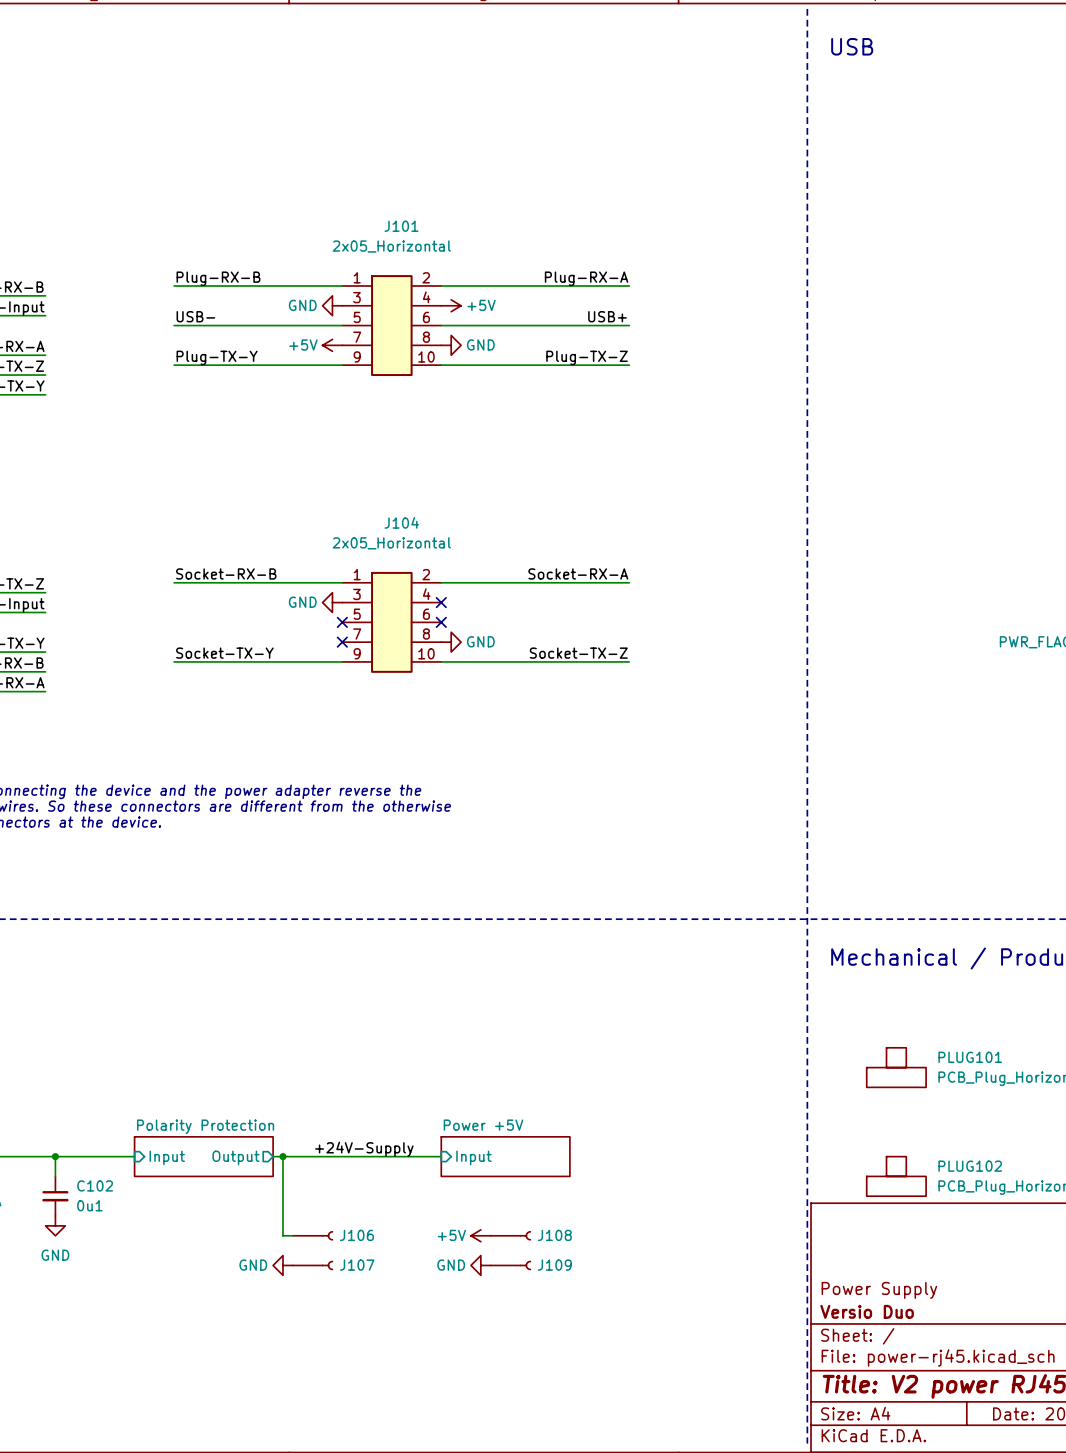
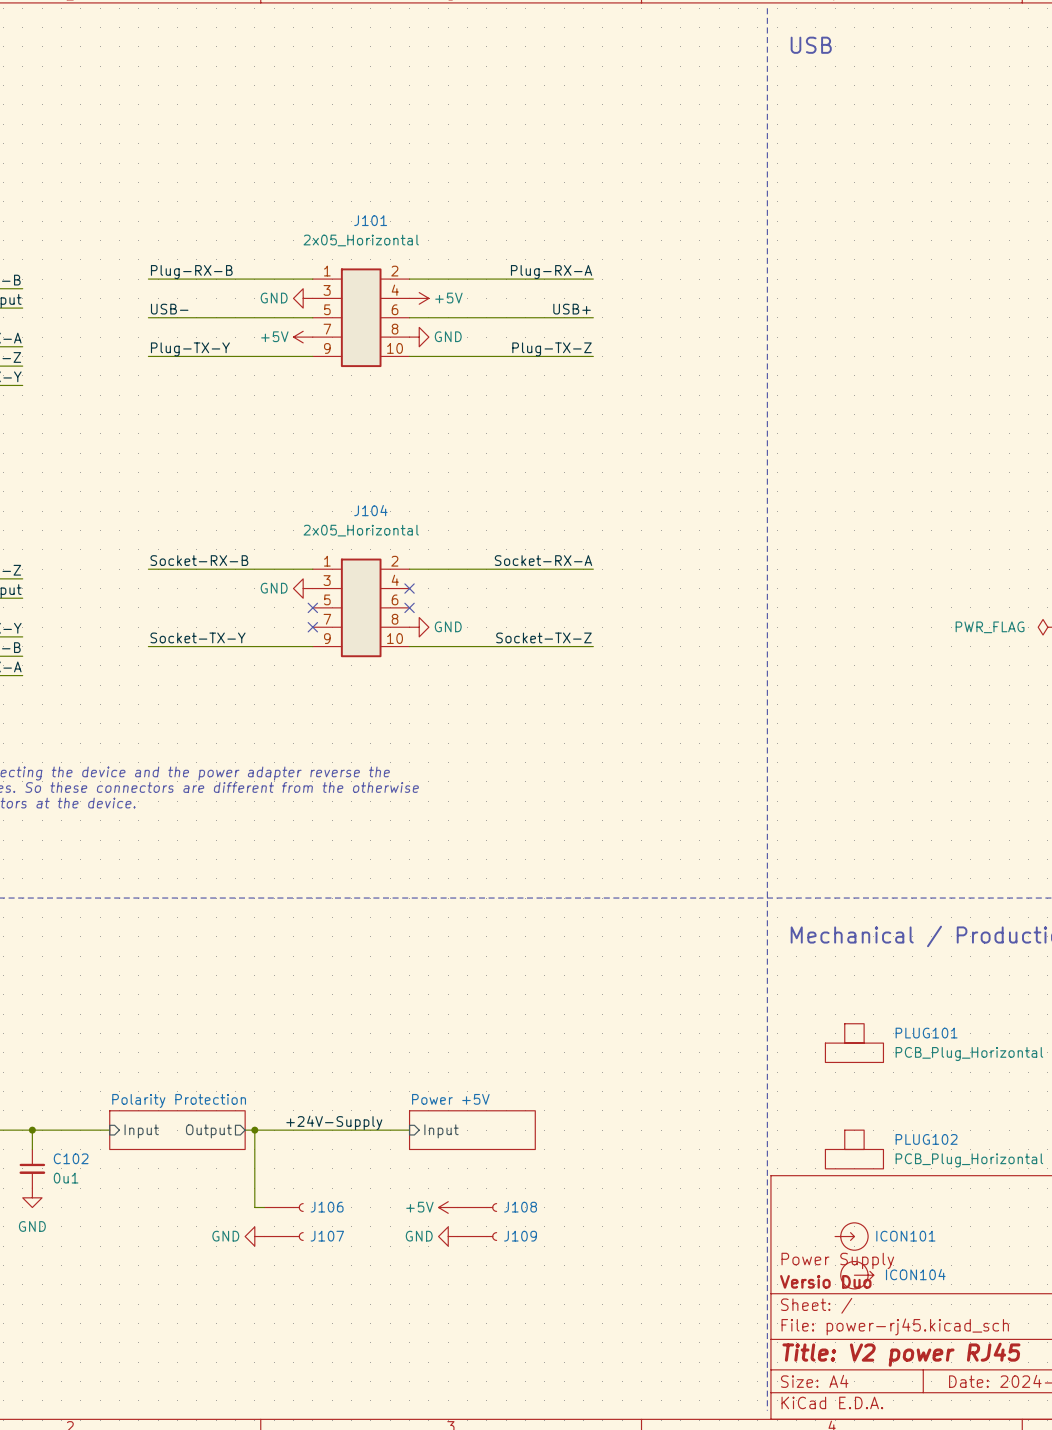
ICON101: none -> (851, 1236)
ICON104: none -> (857, 1275)

